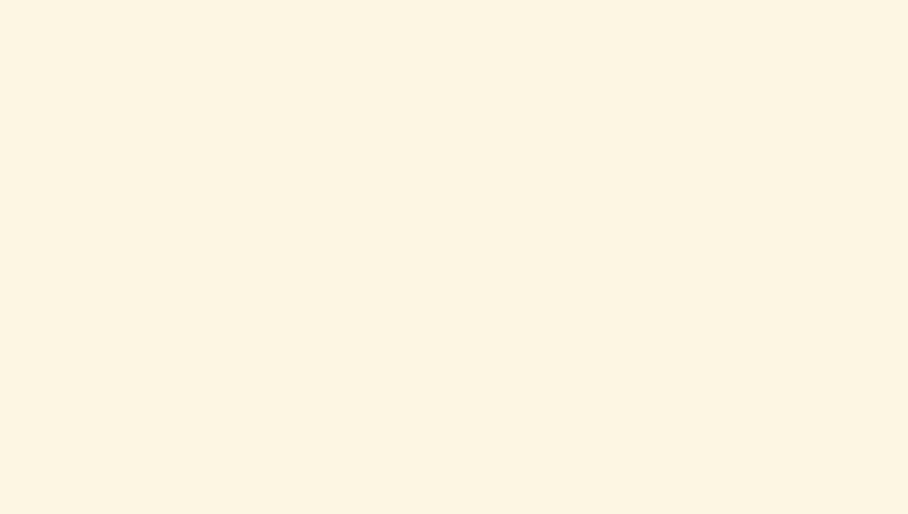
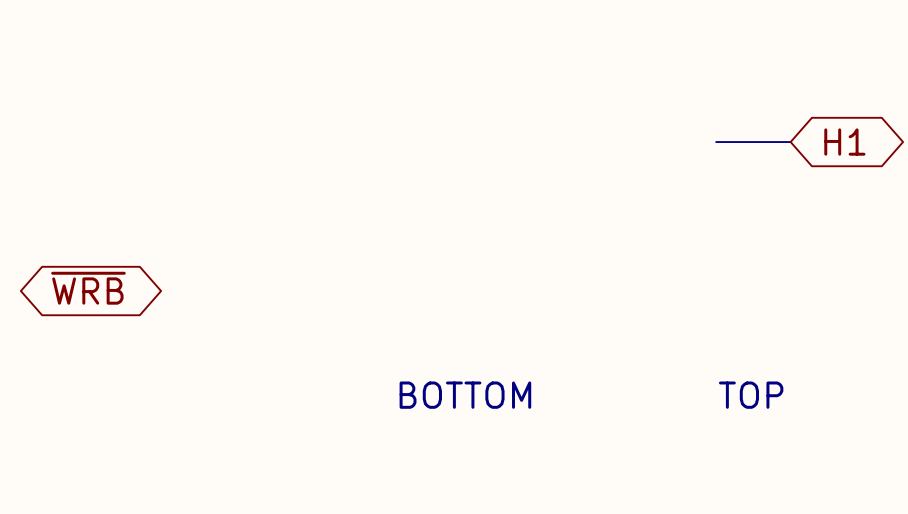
wire: none -> (716, 142) (790, 142)
global label: none -> H1 (844, 142)
global label: none -> ~{WRB} (88, 288)
text: none -> BOTTOM (465, 395)
text: none -> TOP (751, 395)

